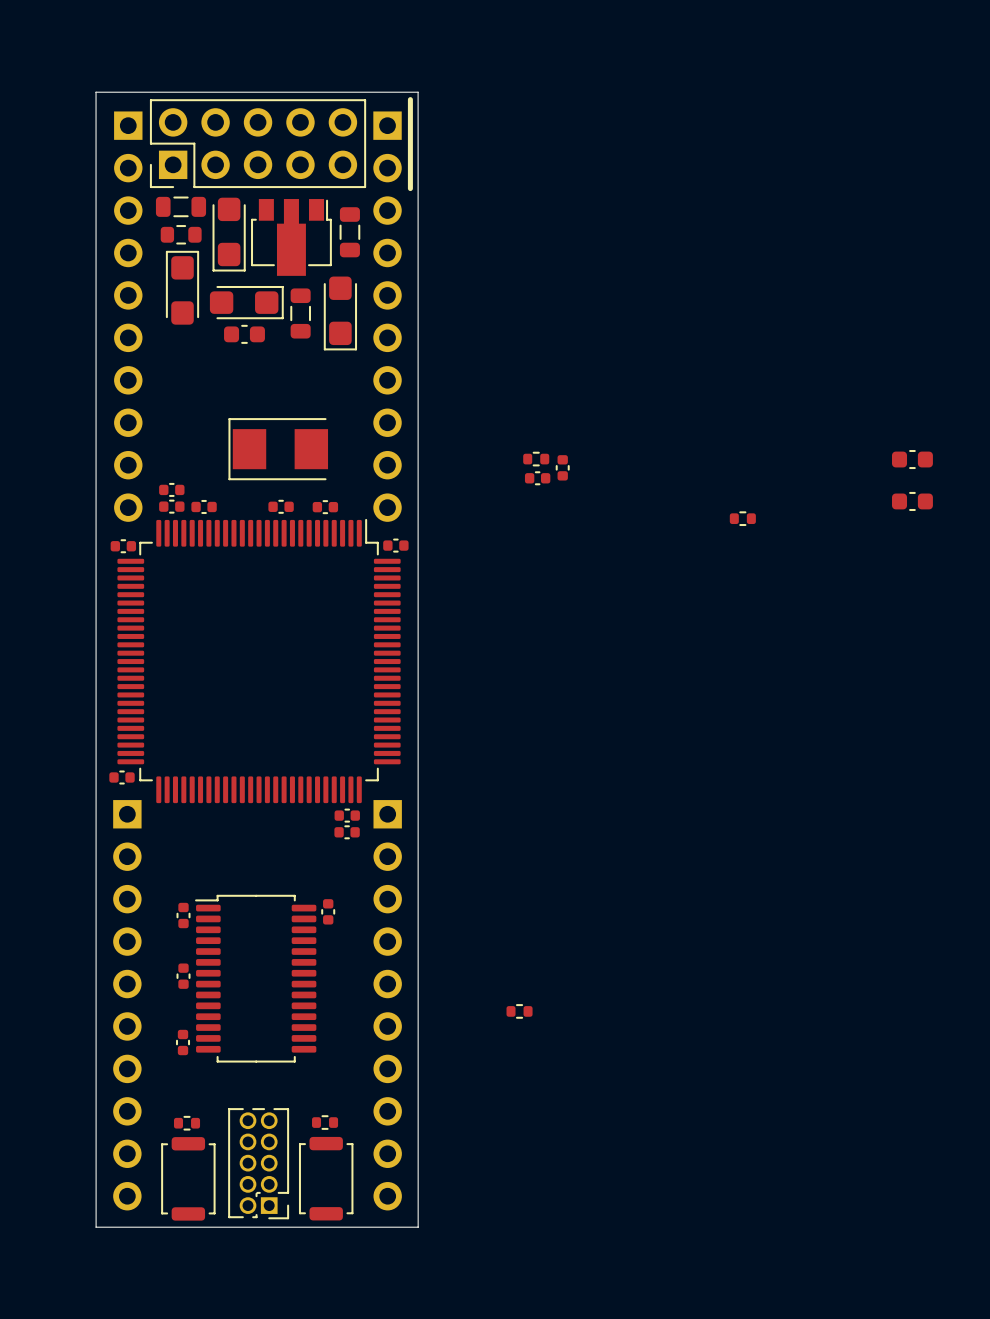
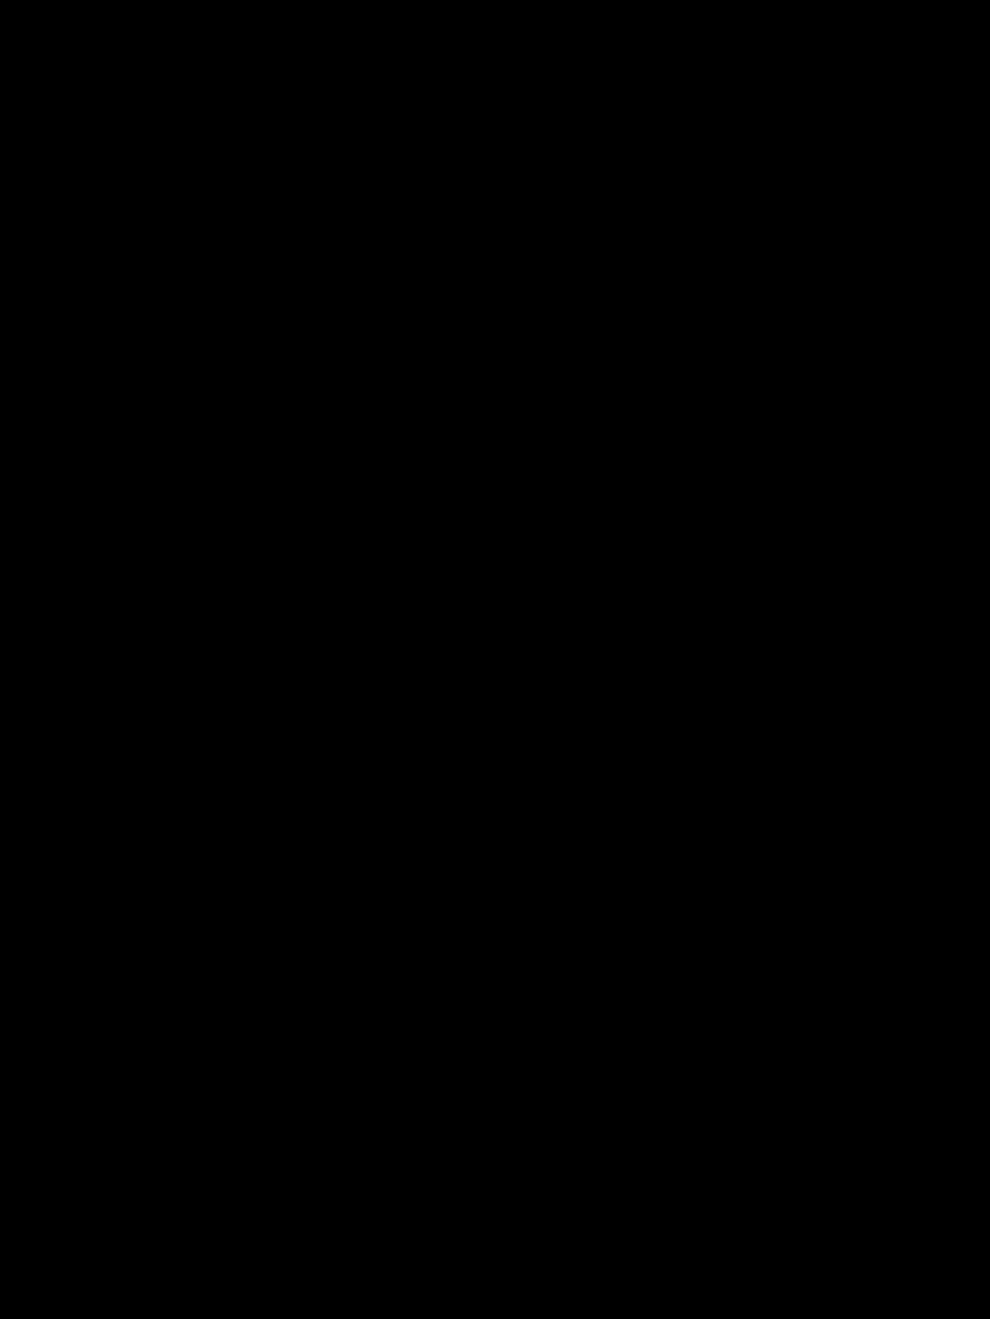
board edge: (96, 92) (96, 1227) (418, 1227) (418, 92) (96, 92) -> none
line: (410, 99) (410, 188) -> none
part: (258, 143) -> none
part: (181, 206) -> none
part: (349, 232) -> none
part: (181, 234) -> none
part: (229, 234) -> none
part: (291, 237) -> none
part: (182, 287) -> none
part: (246, 302) -> none
part: (300, 313) -> none
part: (340, 313) -> none
part: (128, 316) -> none
part: (387, 316) -> none
part: (244, 334) -> none
part: (278, 449) -> none
part: (536, 459) -> none
part: (912, 459) -> none
part: (562, 467) -> none
part: (537, 478) -> none
part: (171, 489) -> none
part: (912, 501) -> none
part: (171, 506) -> none
part: (204, 506) -> none
part: (281, 506) -> none
part: (325, 507) -> none
part: (742, 518) -> none
part: (395, 545) -> none
part: (123, 546) -> none
part: (259, 661) -> none
part: (122, 777) -> none
part: (347, 815) -> none
part: (347, 832) -> none
part: (328, 911) -> none
part: (183, 915) -> none
part: (183, 976) -> none
part: (255, 978) -> none
part: (127, 1005) -> none
part: (387, 1005) -> none
part: (519, 1011) -> none
part: (183, 1042) -> none
part: (325, 1122) -> none
part: (187, 1123) -> none
part: (258, 1163) -> none
part: (188, 1178) -> none
part: (326, 1178) -> none

